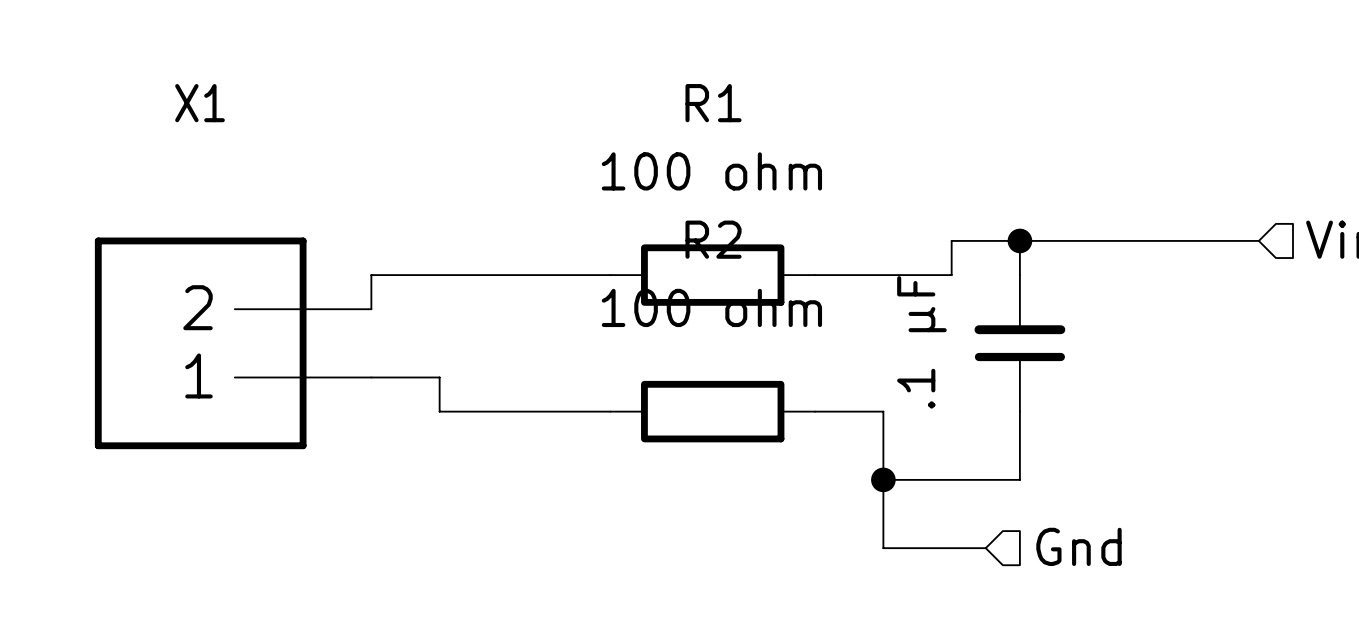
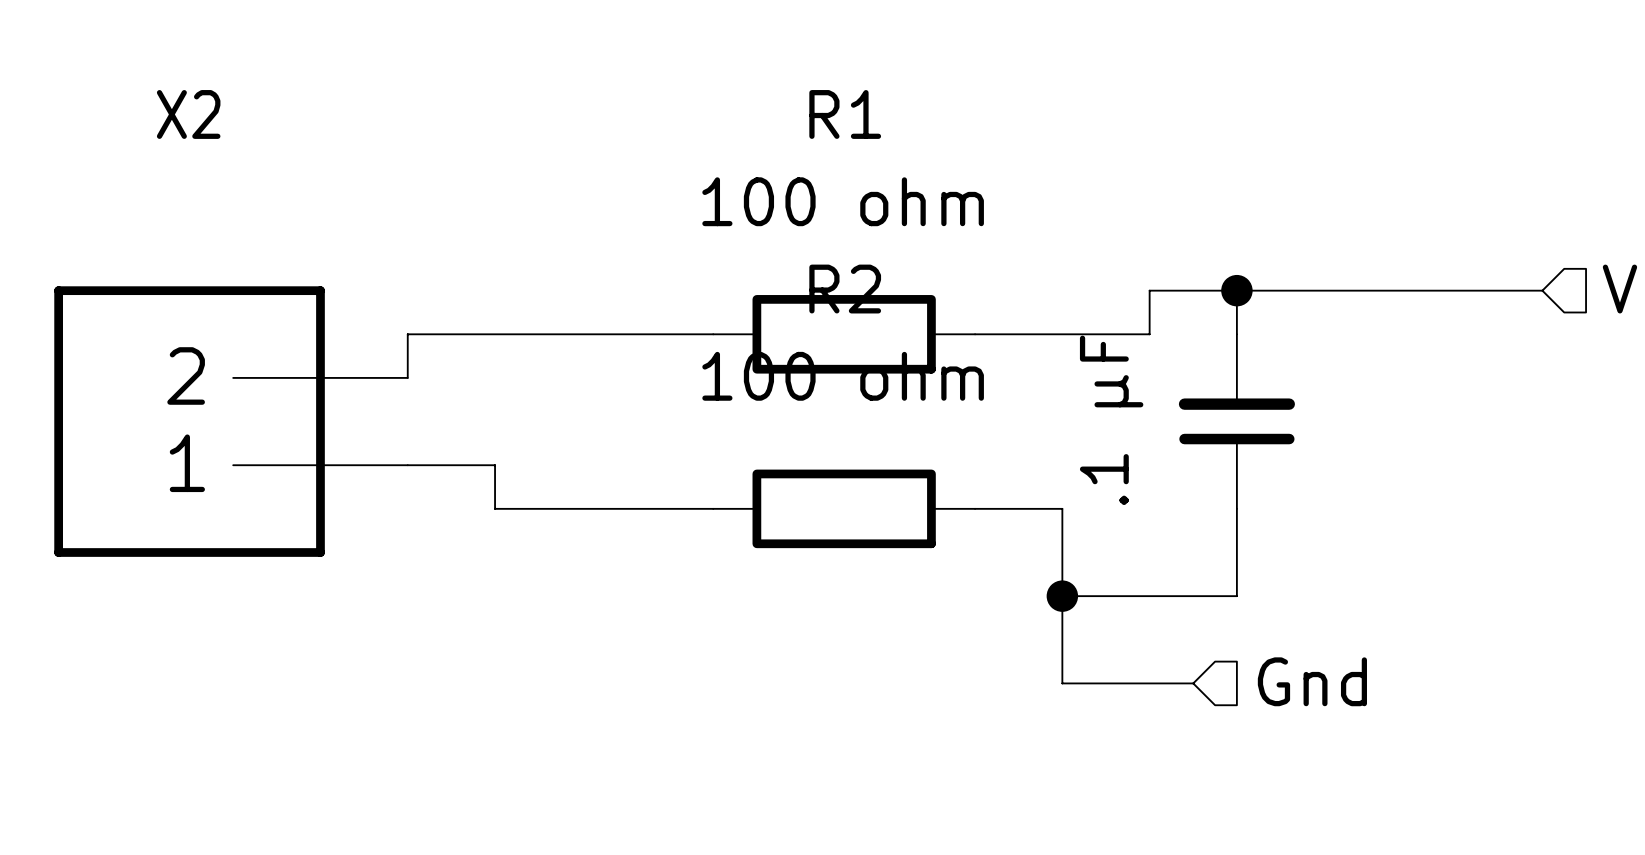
X1 name: X1 (200, 103) -> X2 (188, 114)

